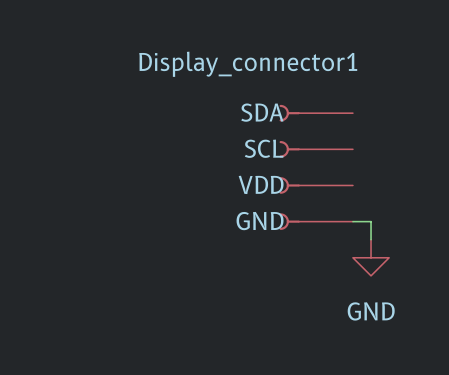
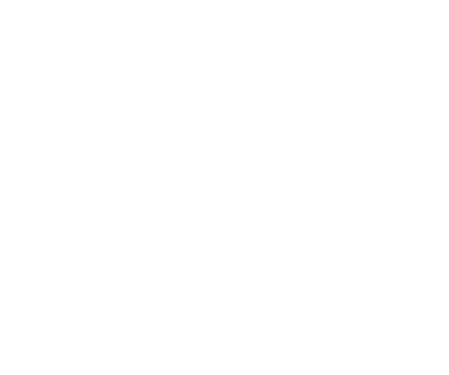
Display_connector1: (316, 167) -> none
wire: (352, 221) (371, 221) (371, 239) -> none
power symbol: GND (371, 257) -> none

